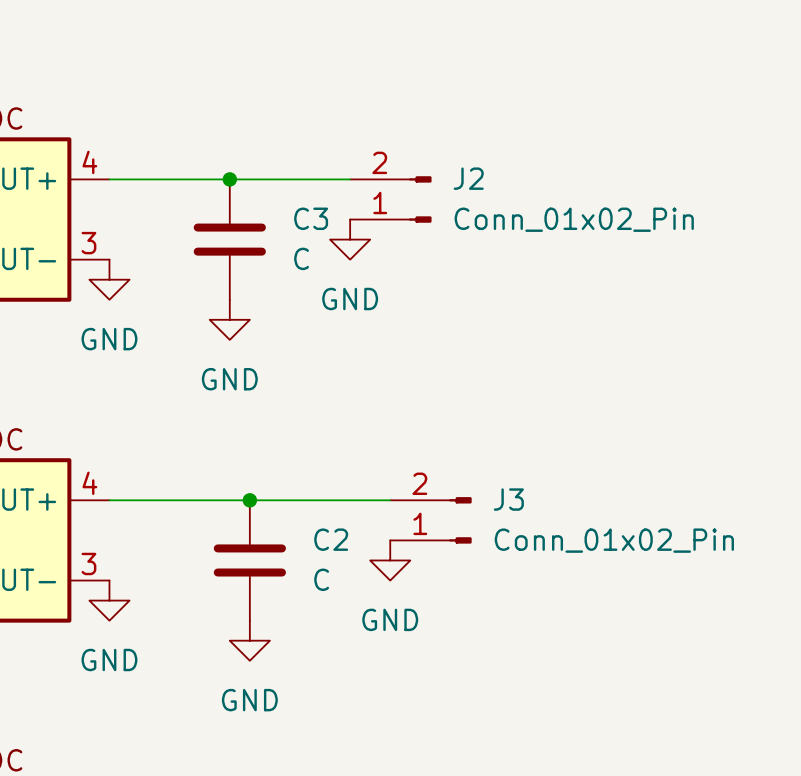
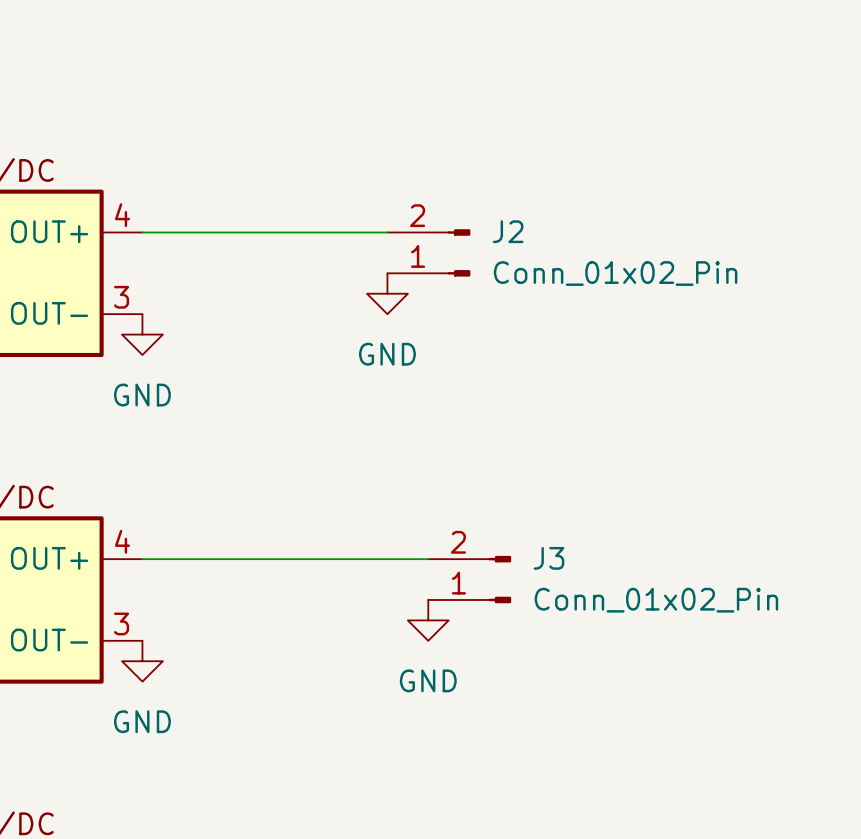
junction: (229, 179) -> none
C3: C (229, 239) -> none
power symbol: GND (229, 319) -> none
junction: (249, 500) -> none
C2: C (249, 560) -> none
power symbol: GND (249, 640) -> none

